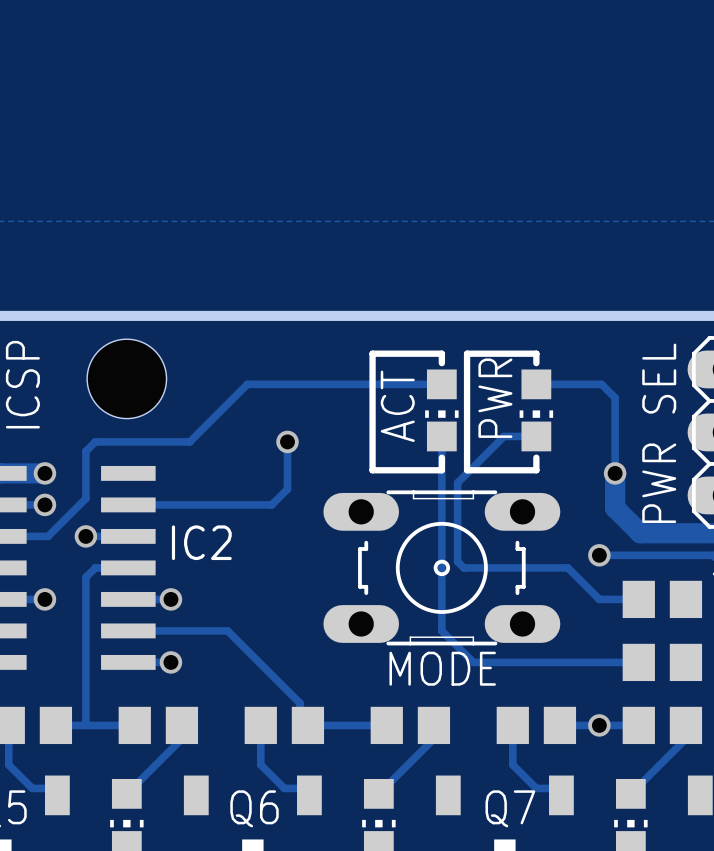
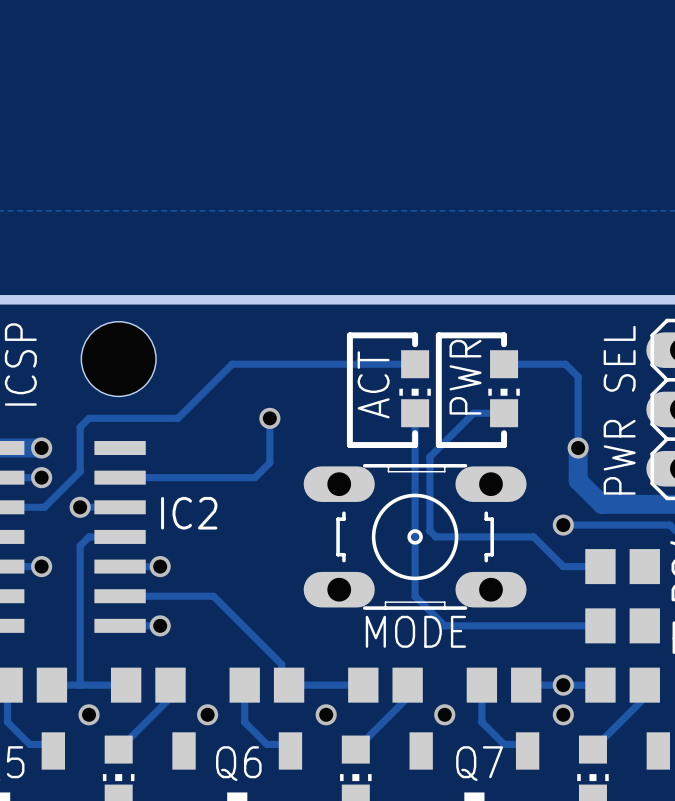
via: none -> (89, 714)
via: none -> (207, 714)
via: none -> (326, 714)
via: none -> (444, 714)
via: none -> (563, 714)

